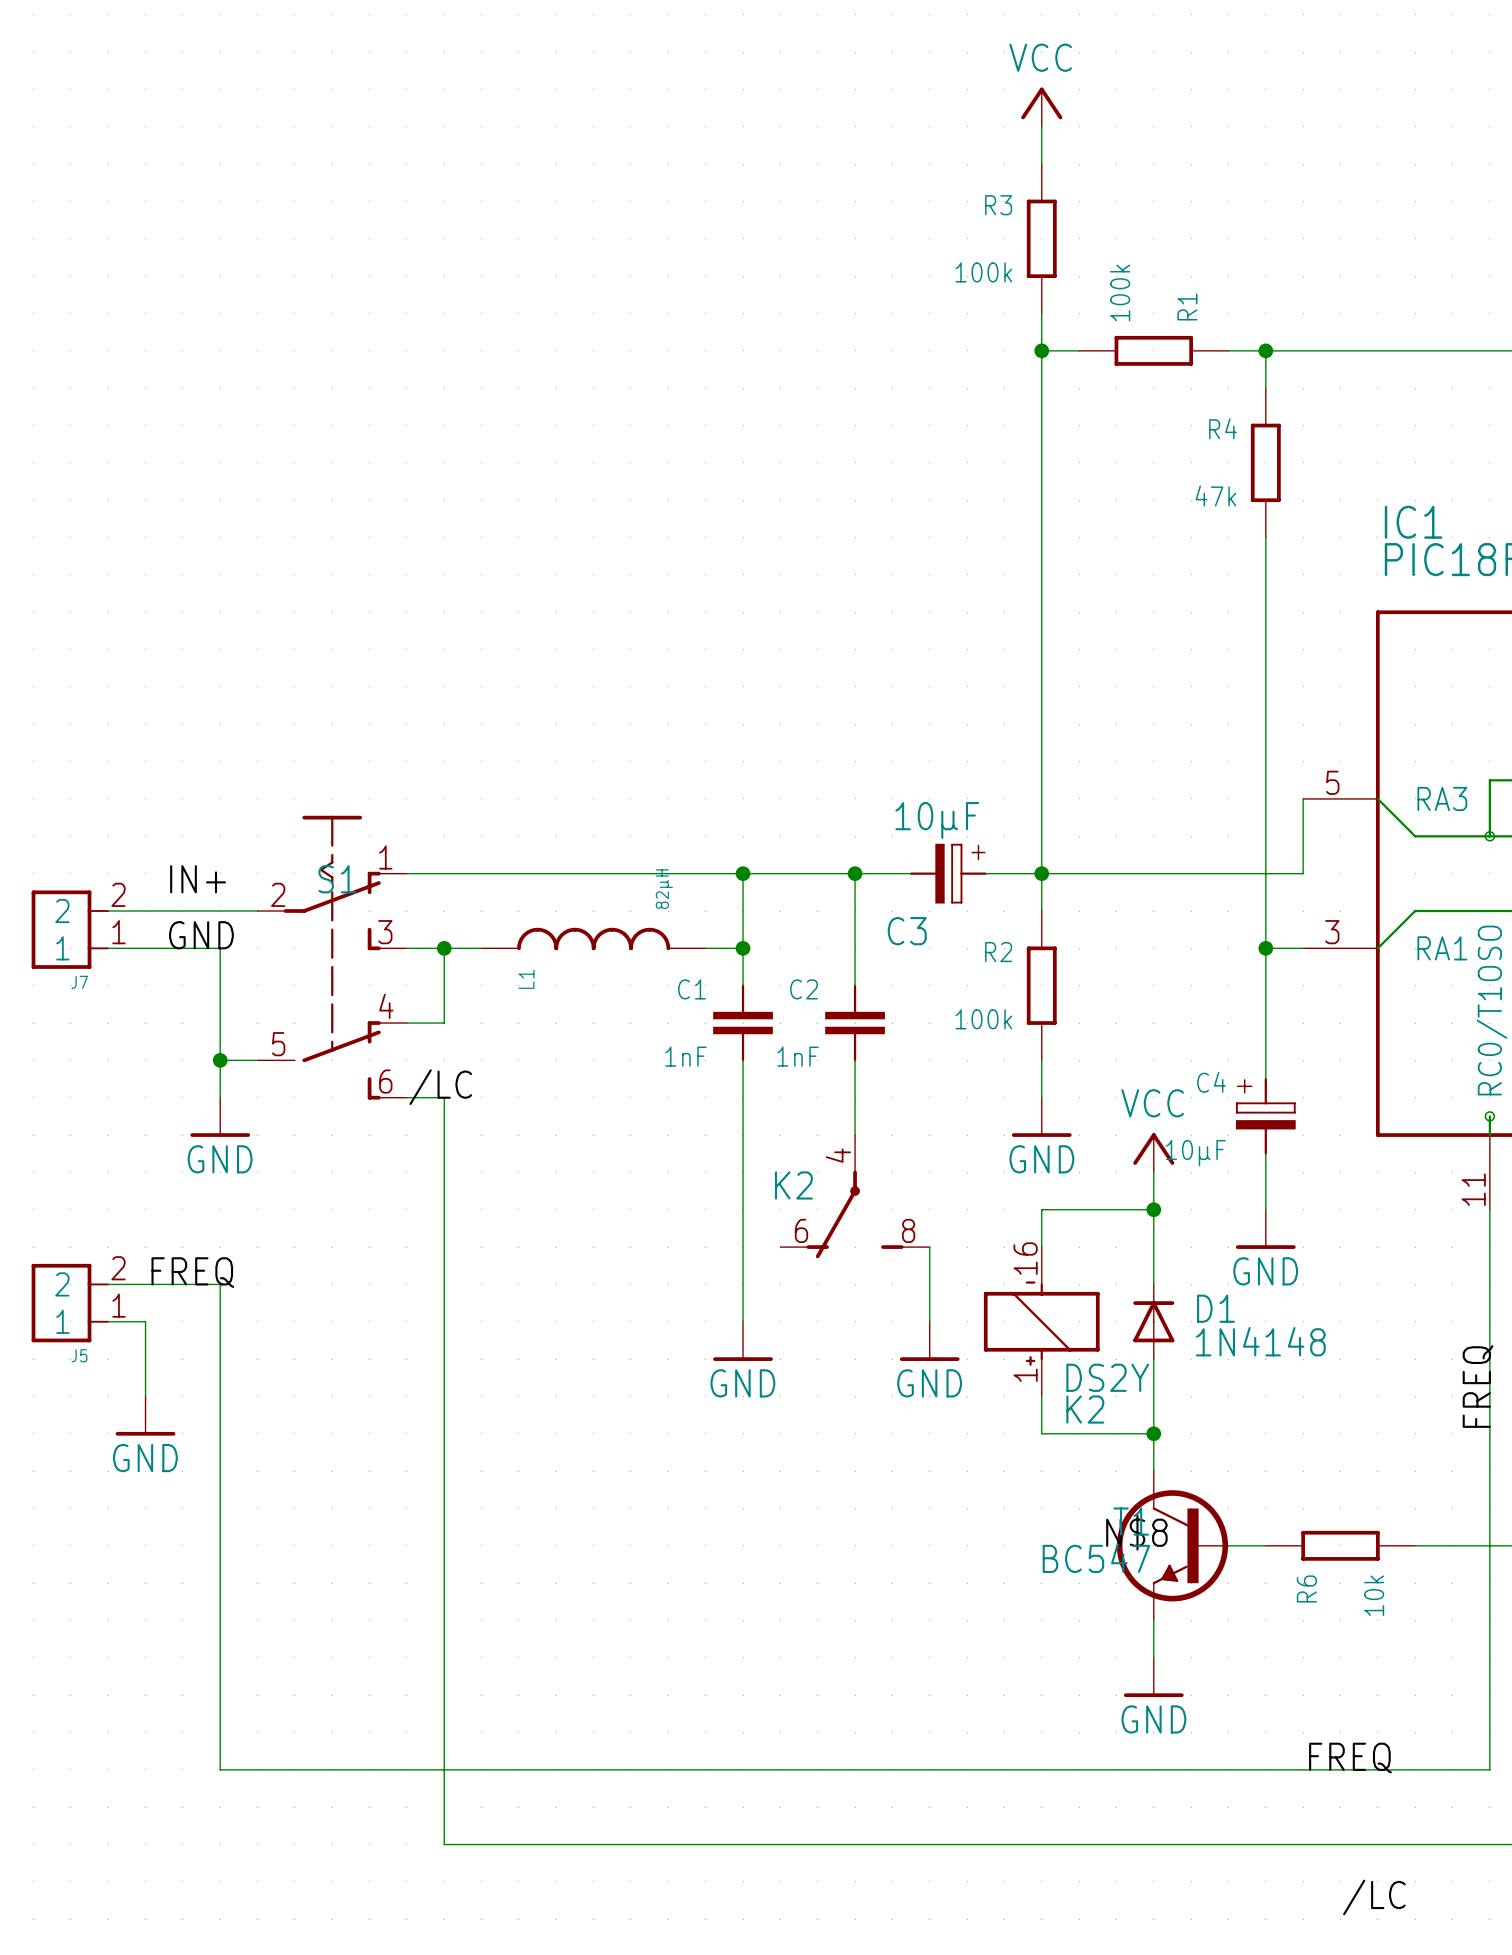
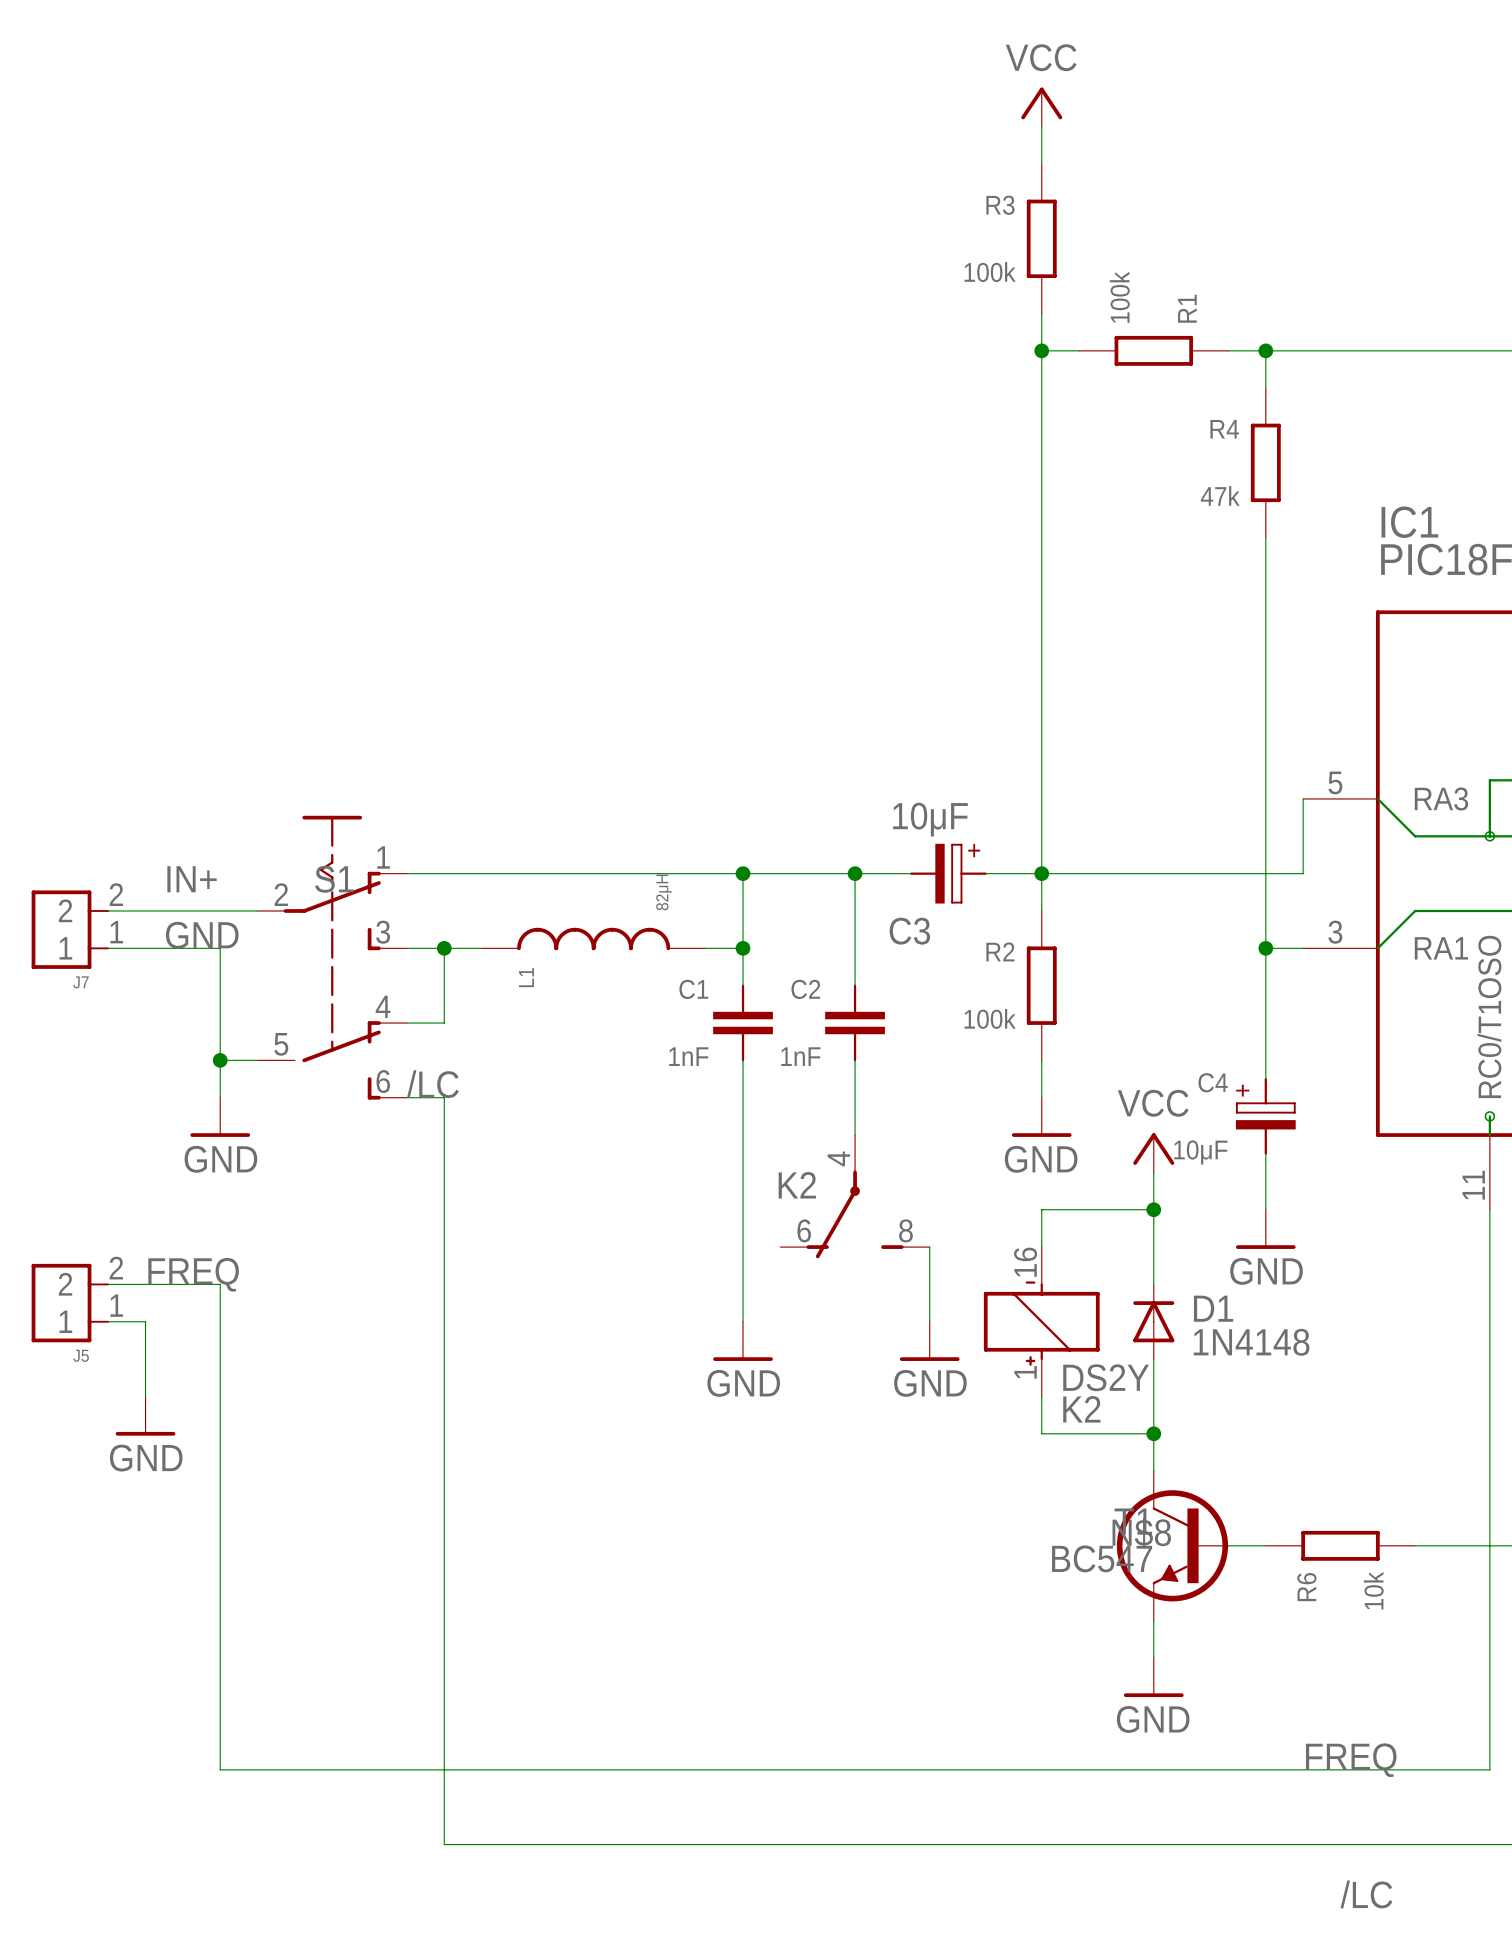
label: FREQ (1478, 1386) -> none

